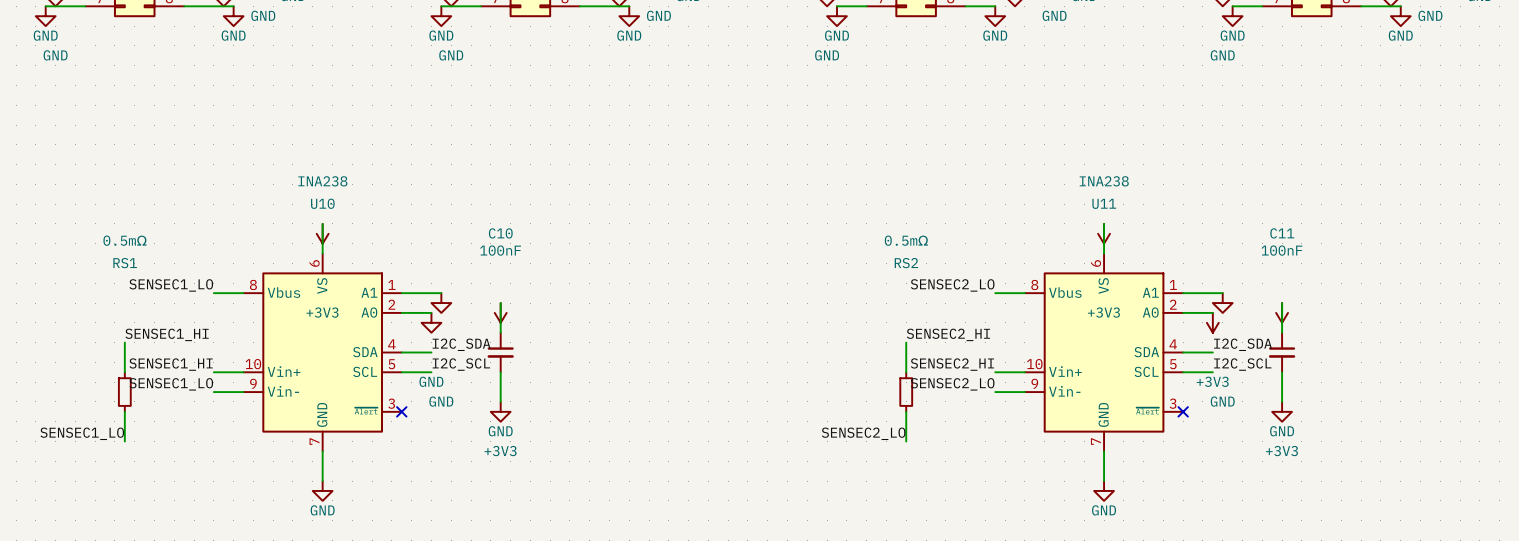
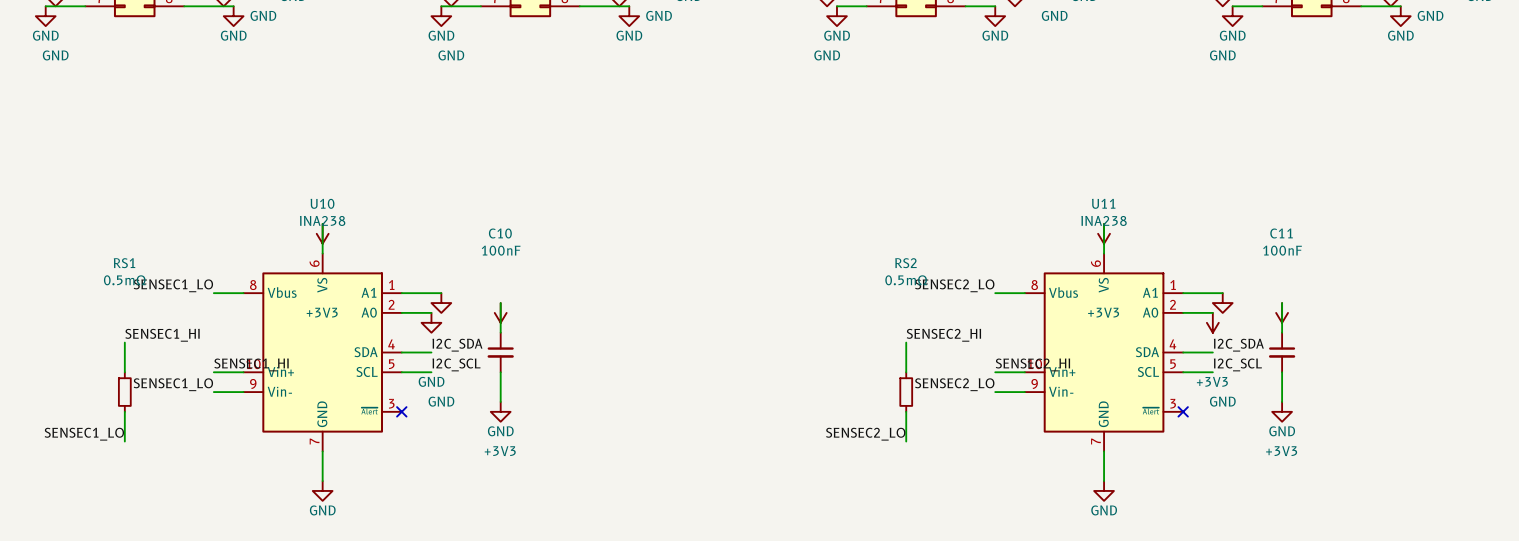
U10 value position: INA238 (322, 181) -> INA238 (322, 220)
U11 value position: INA238 (1104, 181) -> INA238 (1104, 220)
RS1 value position: 0.5mΩ (124, 240) -> 0.5mΩ (124, 280)
RS2 value position: 0.5mΩ (906, 240) -> 0.5mΩ (906, 280)
label position: SENSEC1_HI (171, 364) -> SENSEC1_HI (251, 364)
label position: SENSEC2_HI (952, 364) -> SENSEC2_HI (1032, 364)

